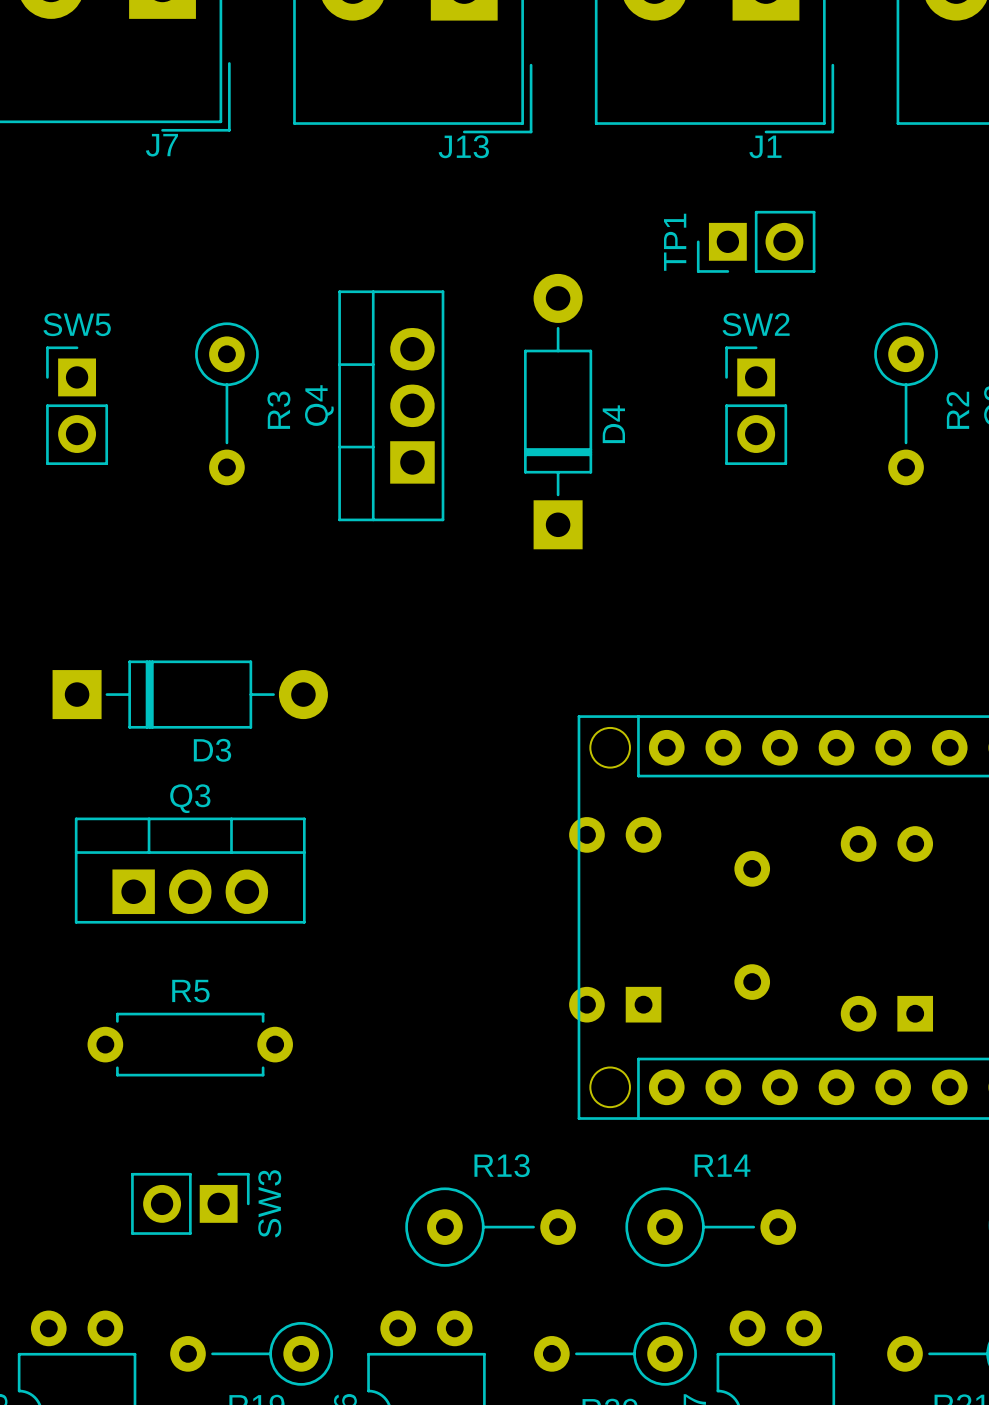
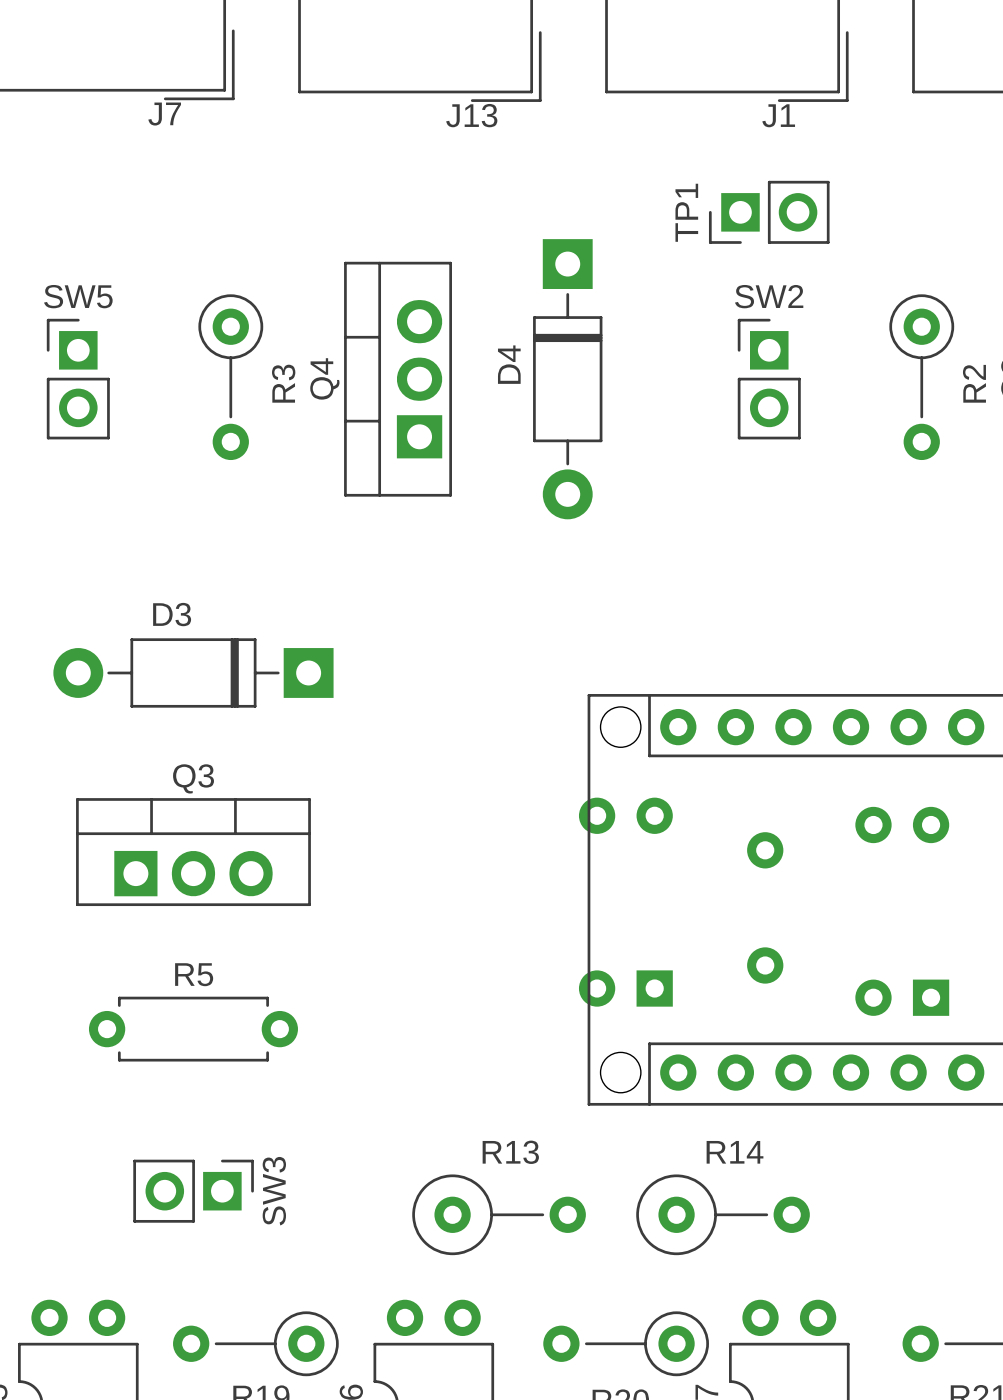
D4 rotation: 0° (558, 411) -> 180° (567, 379)
D3 rotation: 0° (190, 694) -> 180° (193, 672)

